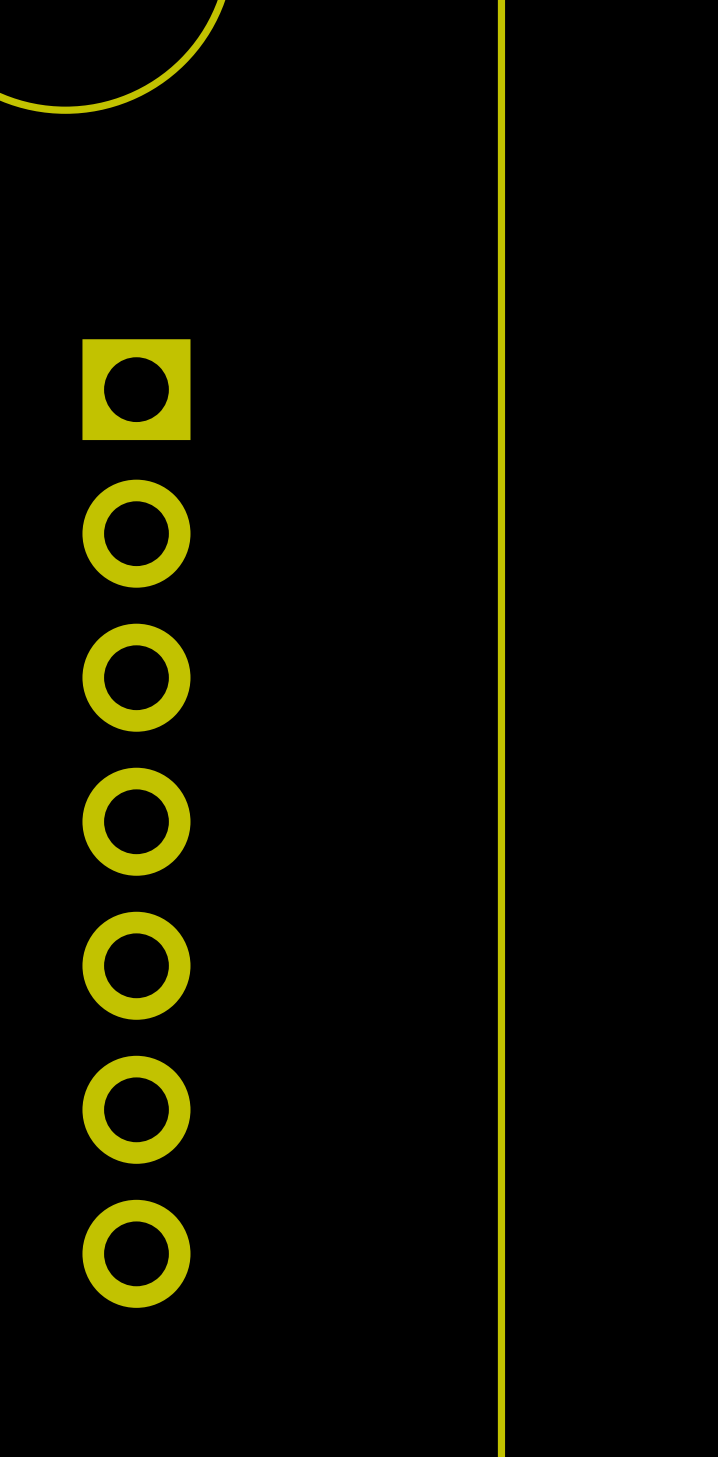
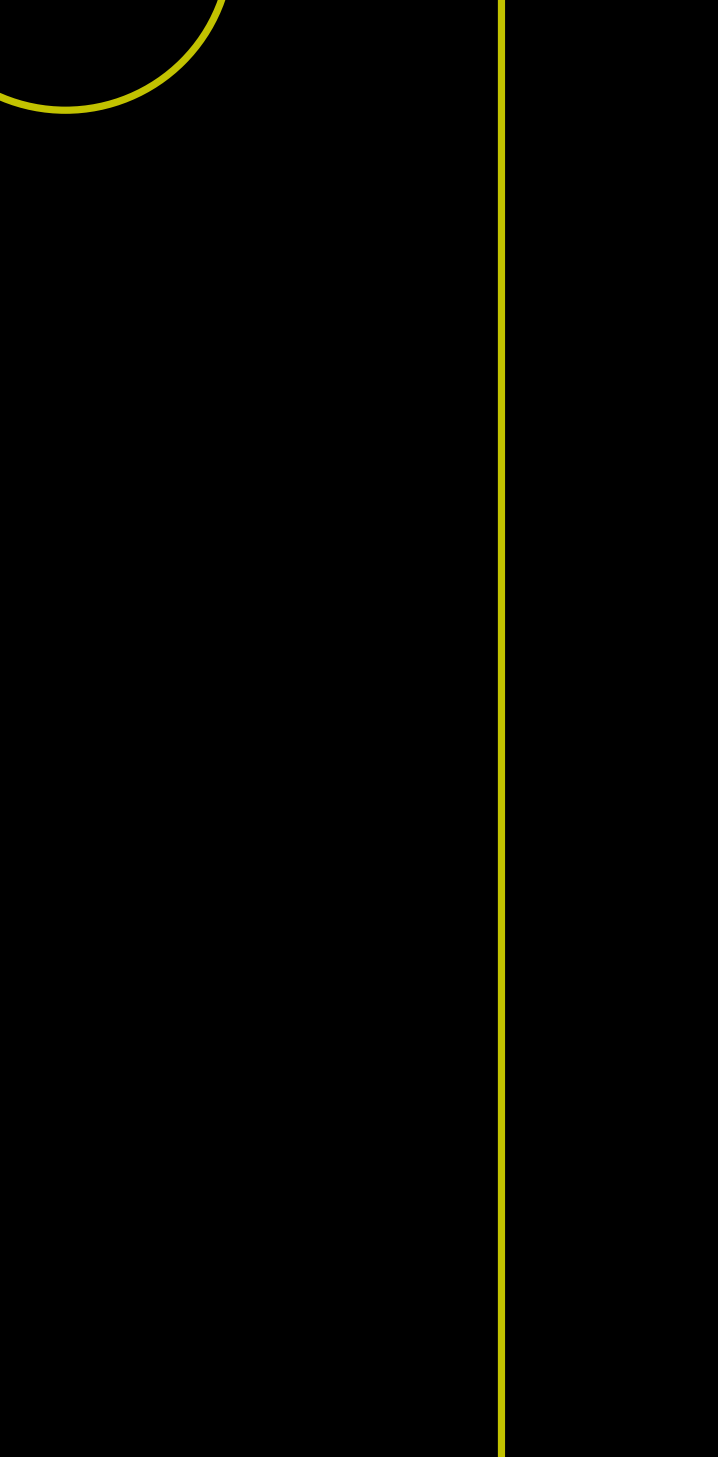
part: (136, 823) -> none

